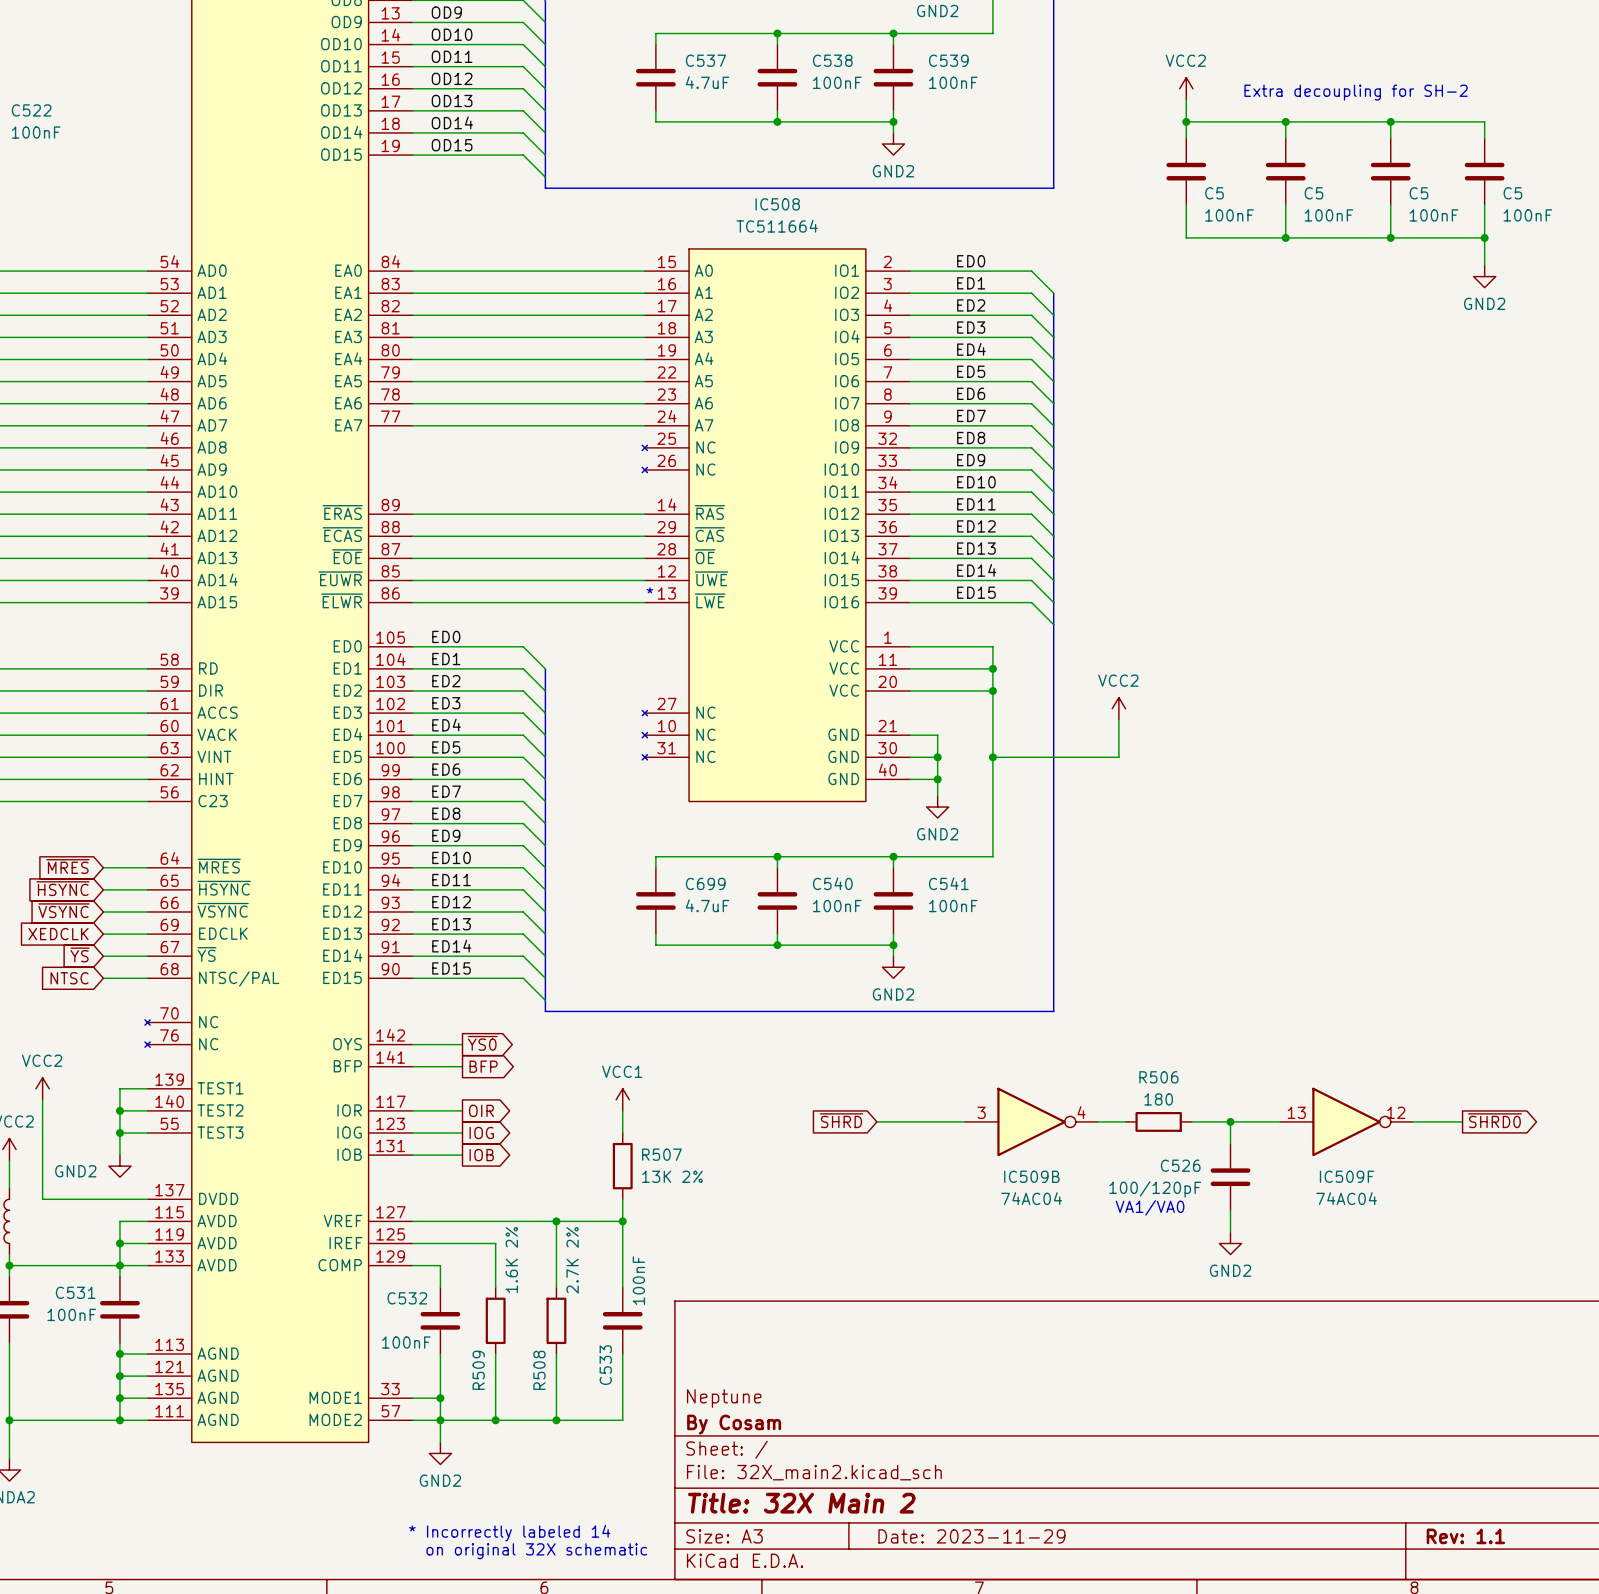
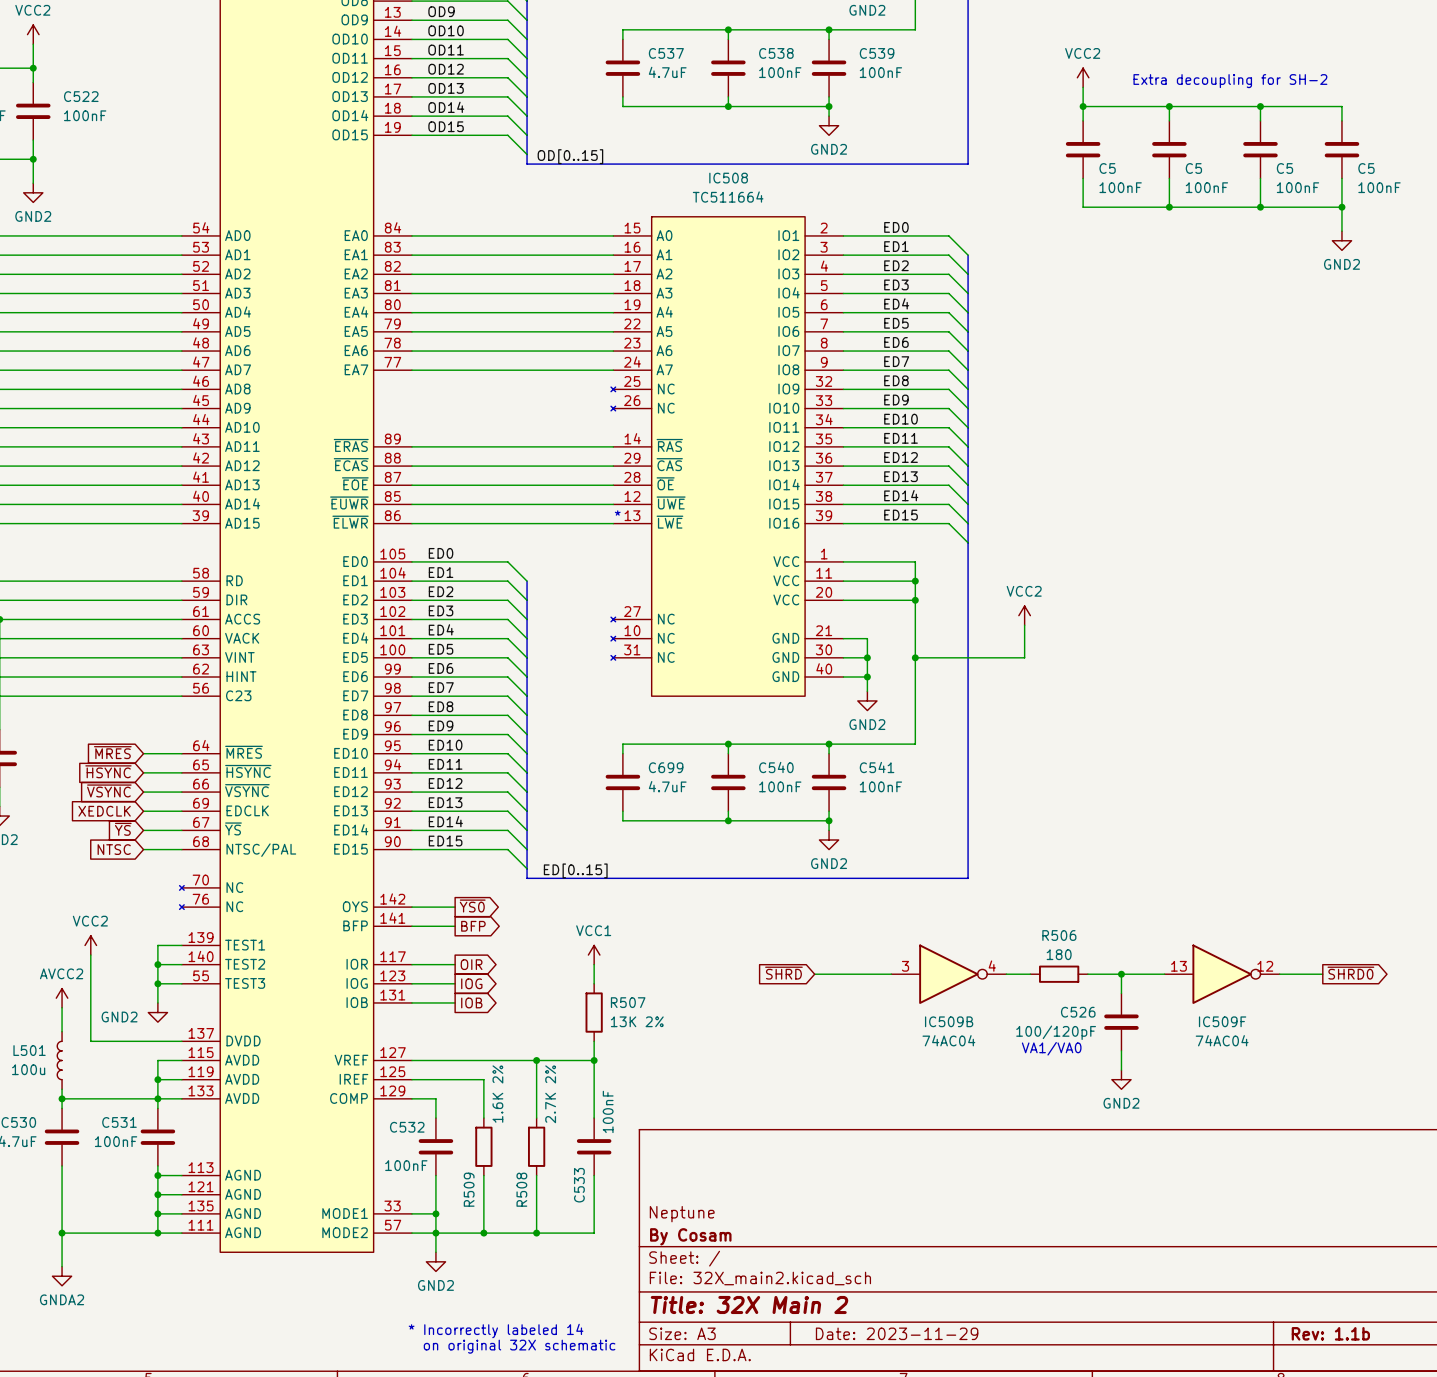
label: none -> OD[0..15] (570, 156)
label: none -> ED[0..15] (575, 870)
title block: Rev: 1.1 (1465, 1536) -> Rev: 1.1b (1330, 1333)

